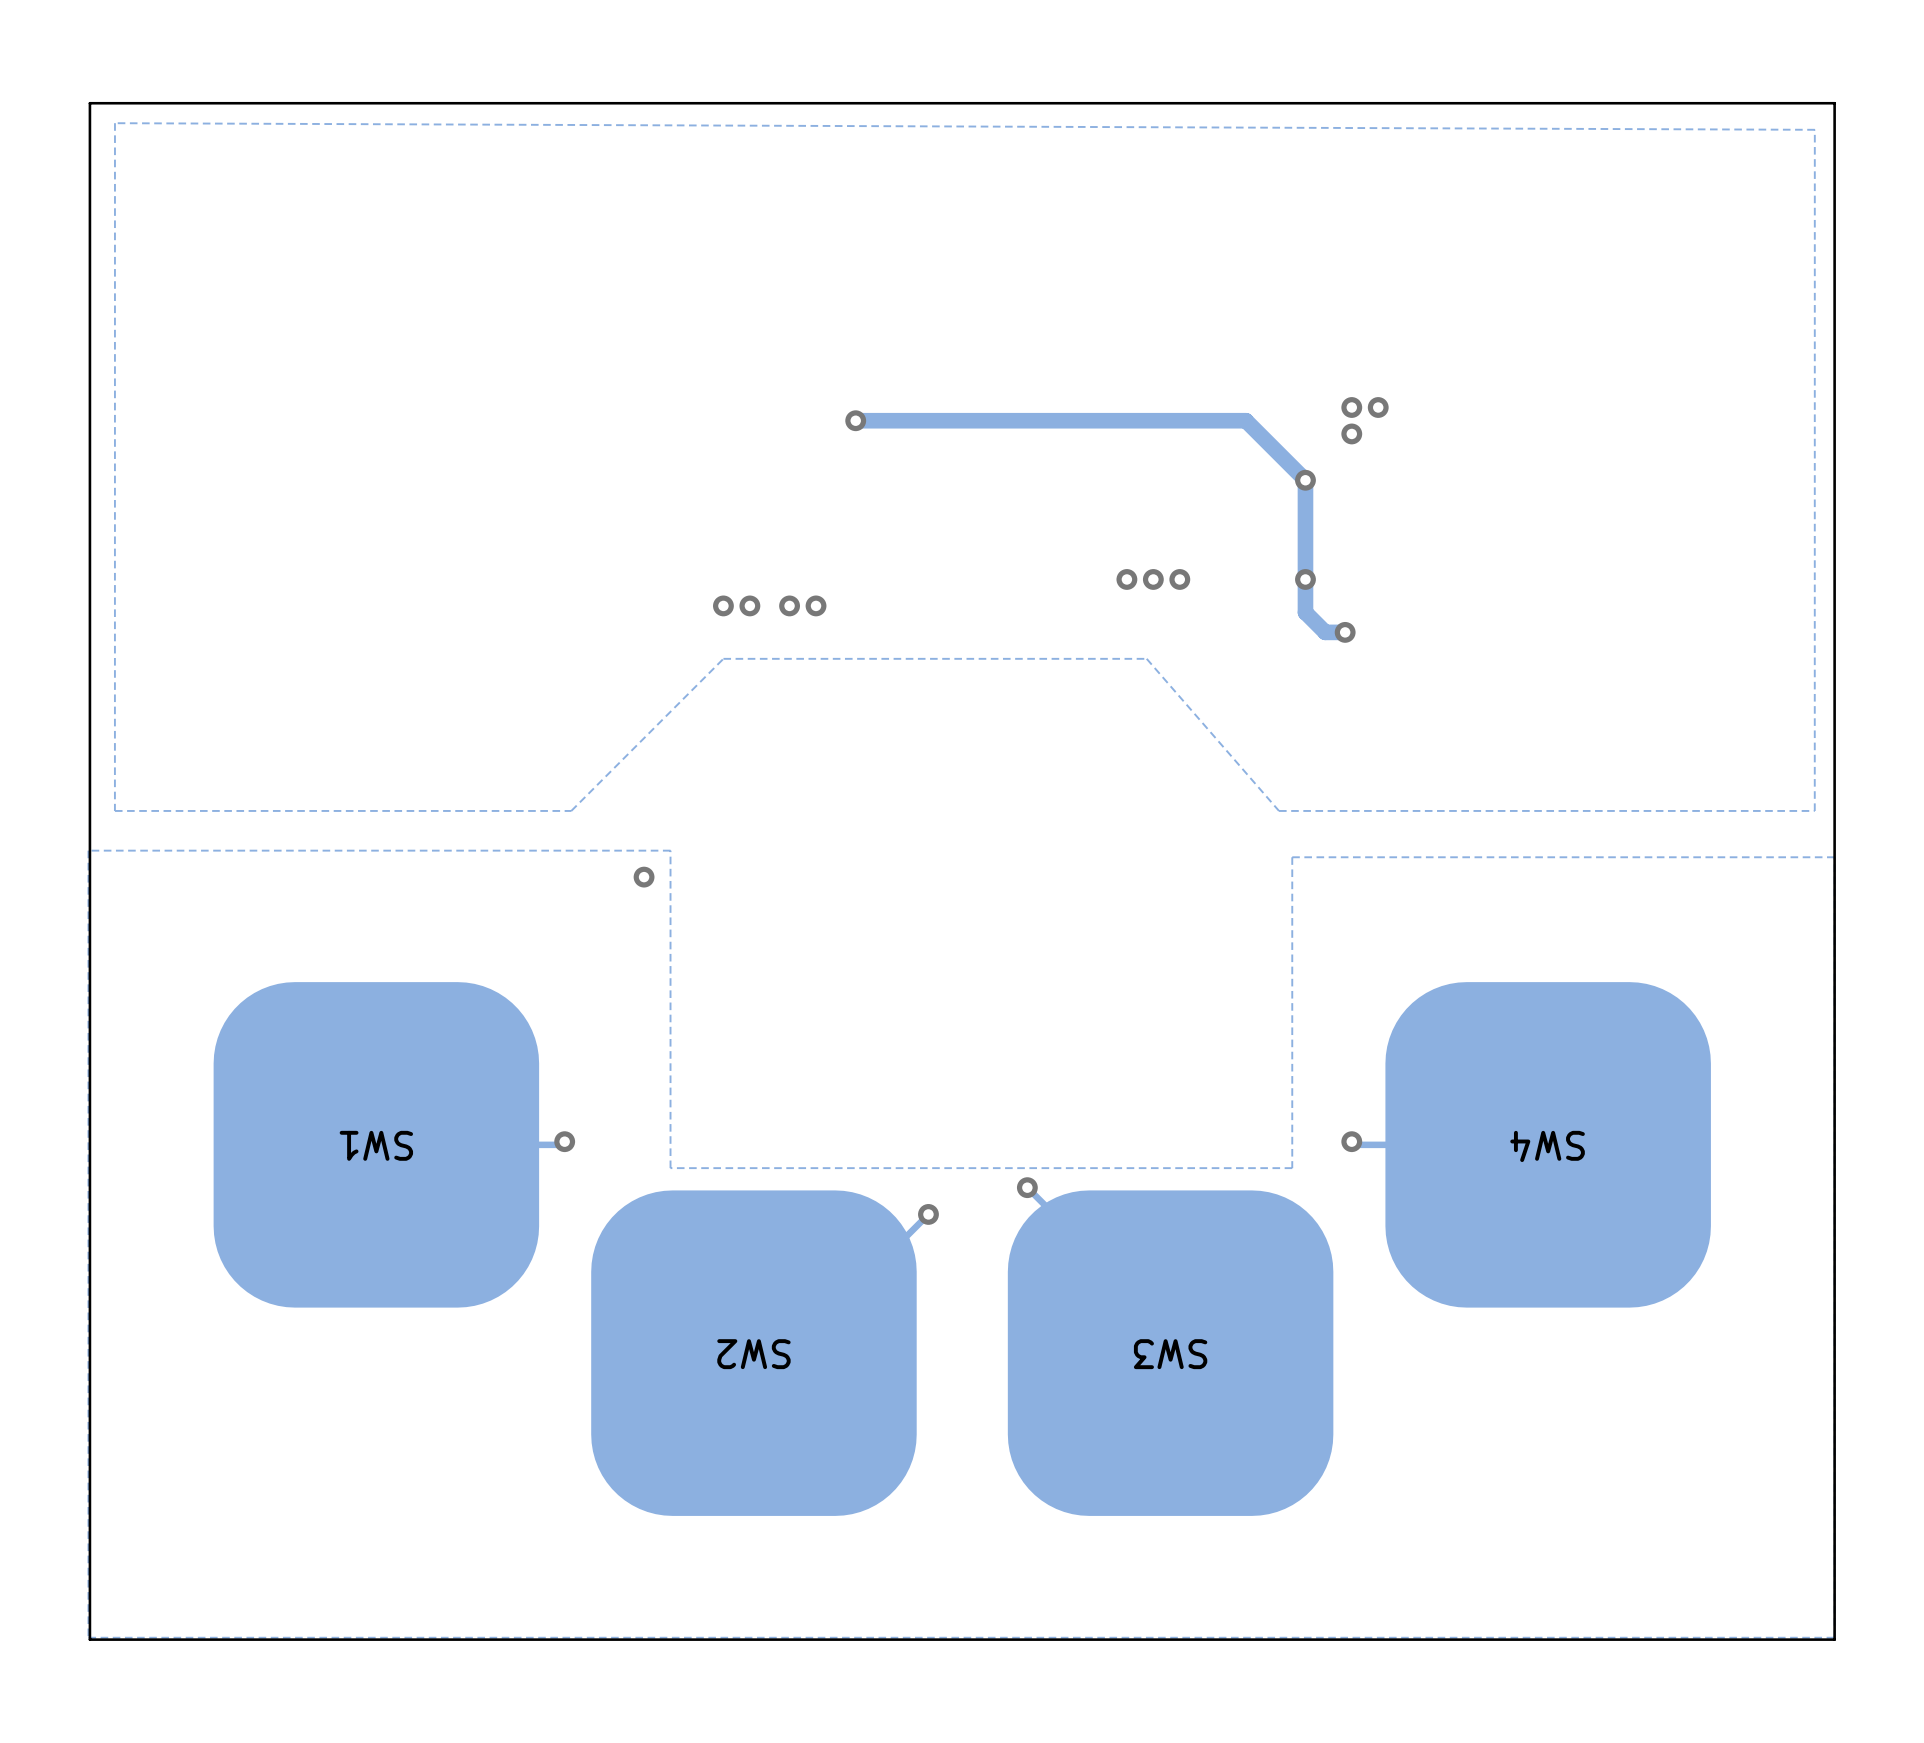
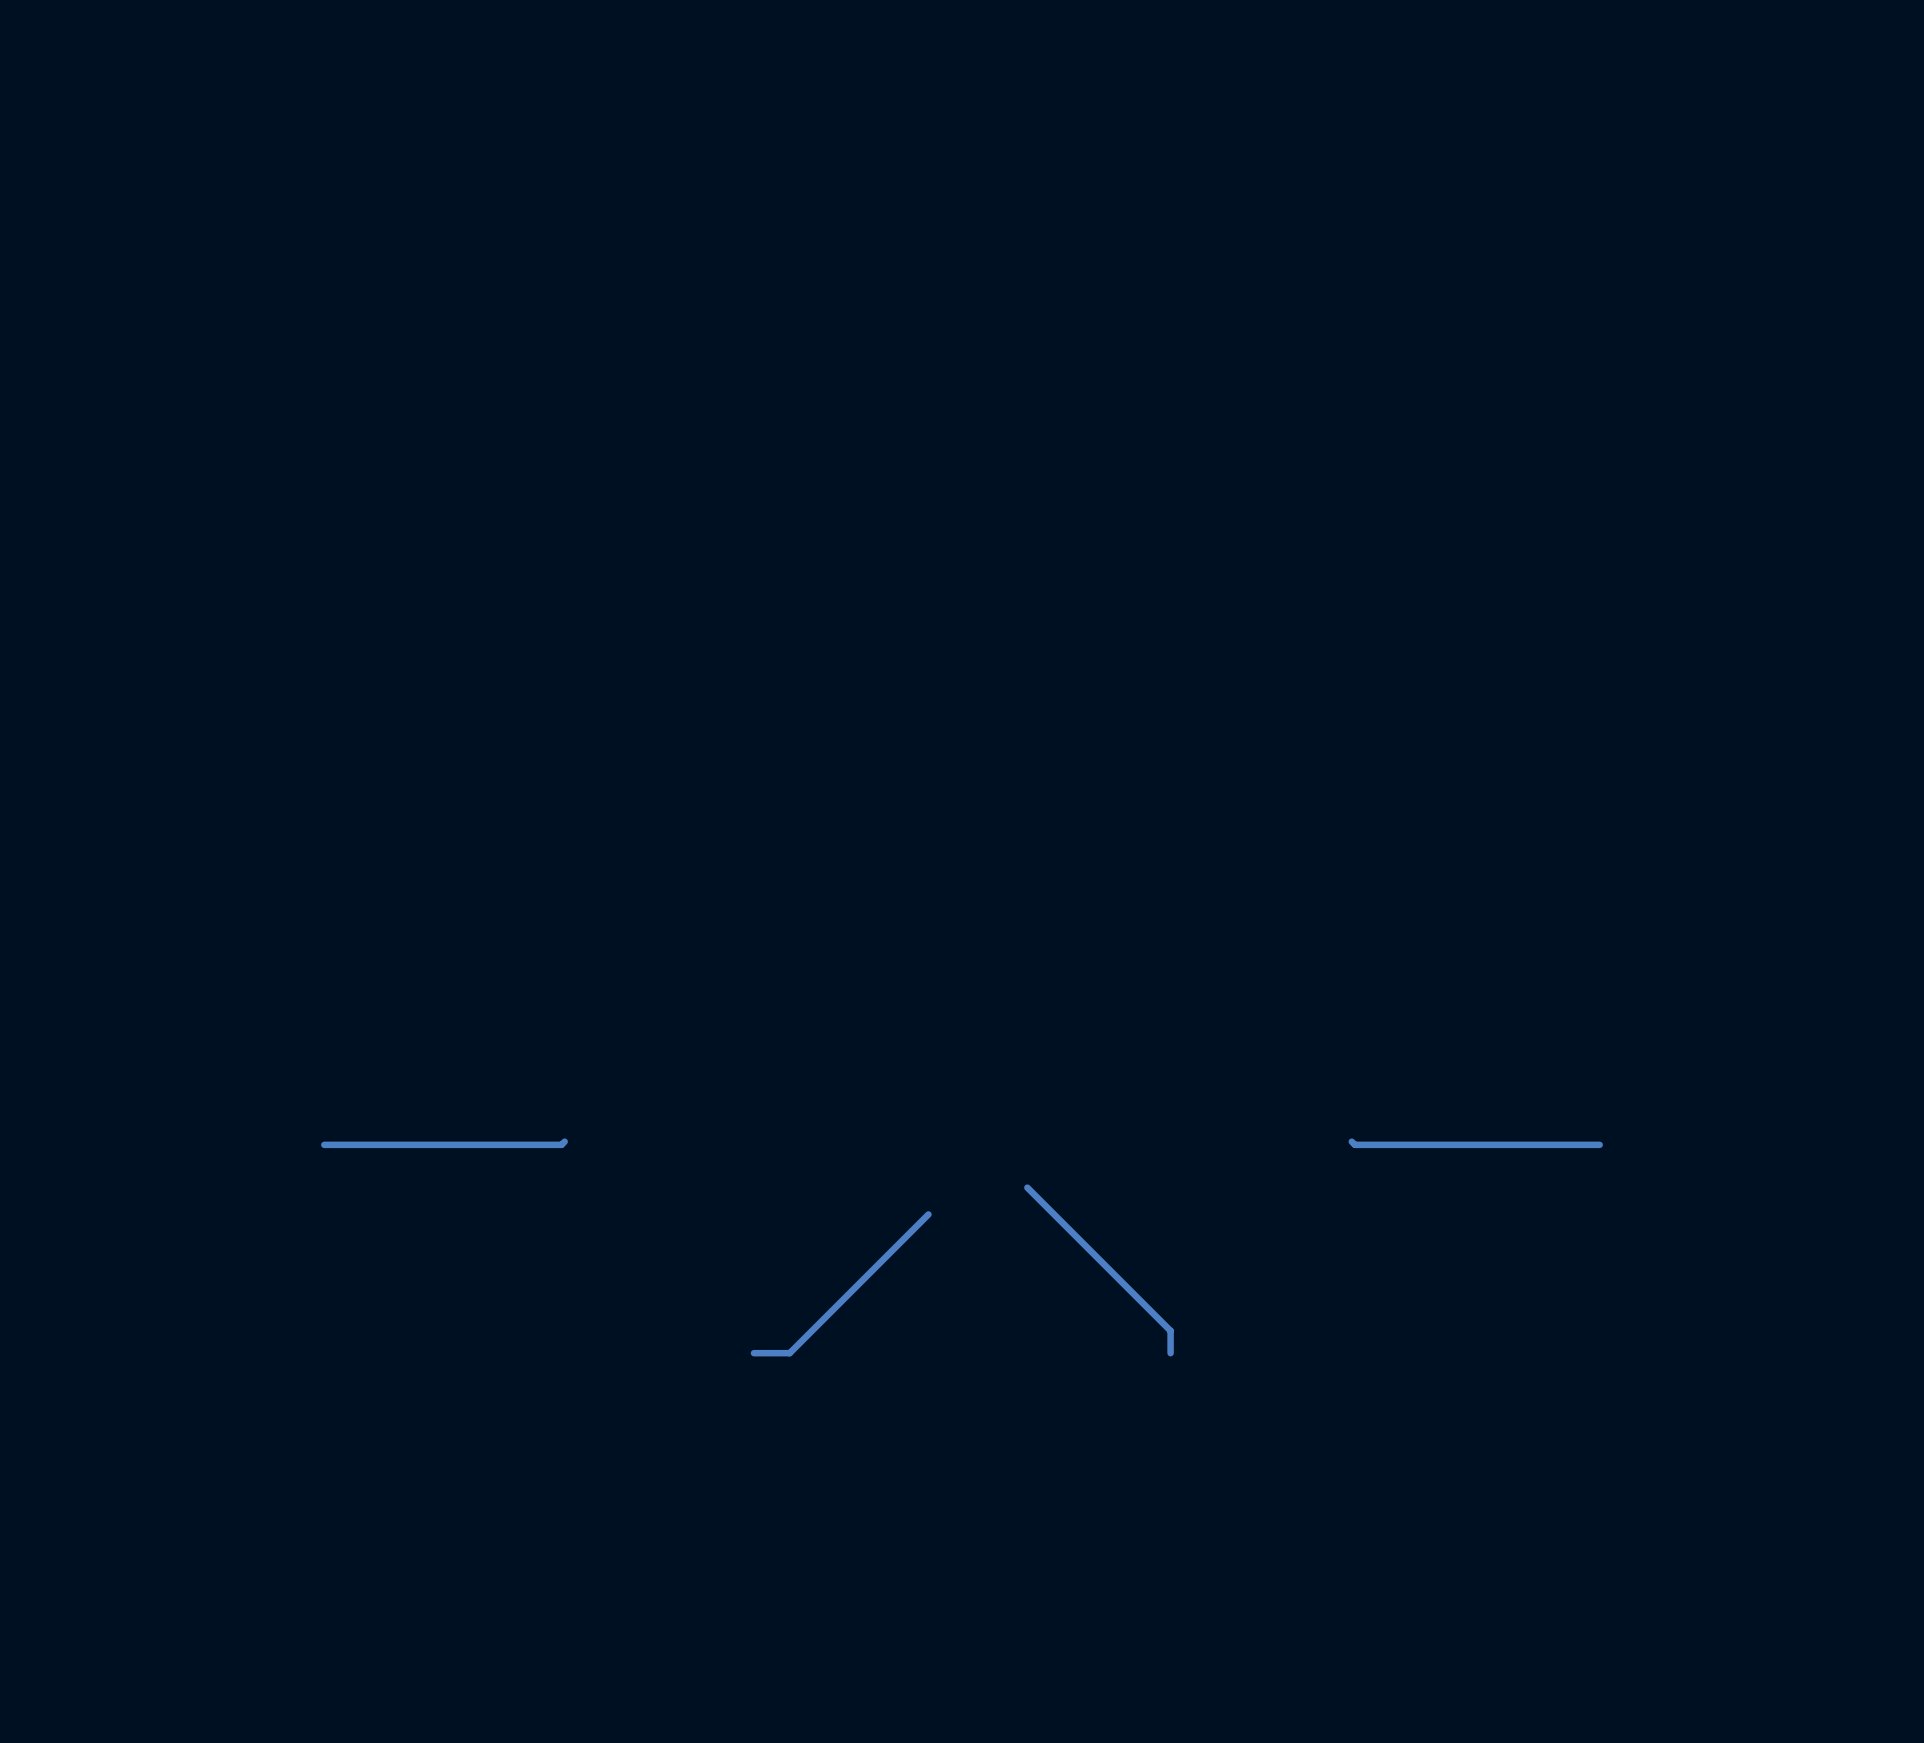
board edge: (1834, 103) (89, 103) (89, 1639) (1834, 1639) (1834, 103) -> none
zone outline: (114, 123) (1814, 129) (1814, 810) (1279, 810) (1146, 658) (723, 658) (571, 810) (114, 810) (114, 123) -> none
via: (1351, 407) -> none
via: (1378, 407) -> none
track: (855, 420) (1245, 420) (1305, 480) (1305, 612) (1325, 632) (1345, 632) -> none
via: (855, 420) -> none
via: (1351, 433) -> none
via: (1305, 480) -> none
via: (1126, 579) -> none
via: (1153, 579) -> none
via: (1179, 579) -> none
via: (1305, 579) -> none
via: (723, 605) -> none
via: (749, 605) -> none
via: (789, 605) -> none
via: (816, 605) -> none
via: (1345, 632) -> none
zone outline: (670, 850) (670, 1168) (1292, 1168) (1292, 857) (1834, 857) (1834, 1637) (88, 1637) (88, 850) (670, 850) -> none
via: (644, 877) -> none
via: (564, 1141) -> none
via: (1351, 1141) -> none
SW1: (376, 1144) -> none
SW4: (1548, 1144) -> none
via: (1027, 1187) -> none
via: (928, 1214) -> none
SW2: (753, 1353) -> none
SW3: (1170, 1353) -> none

